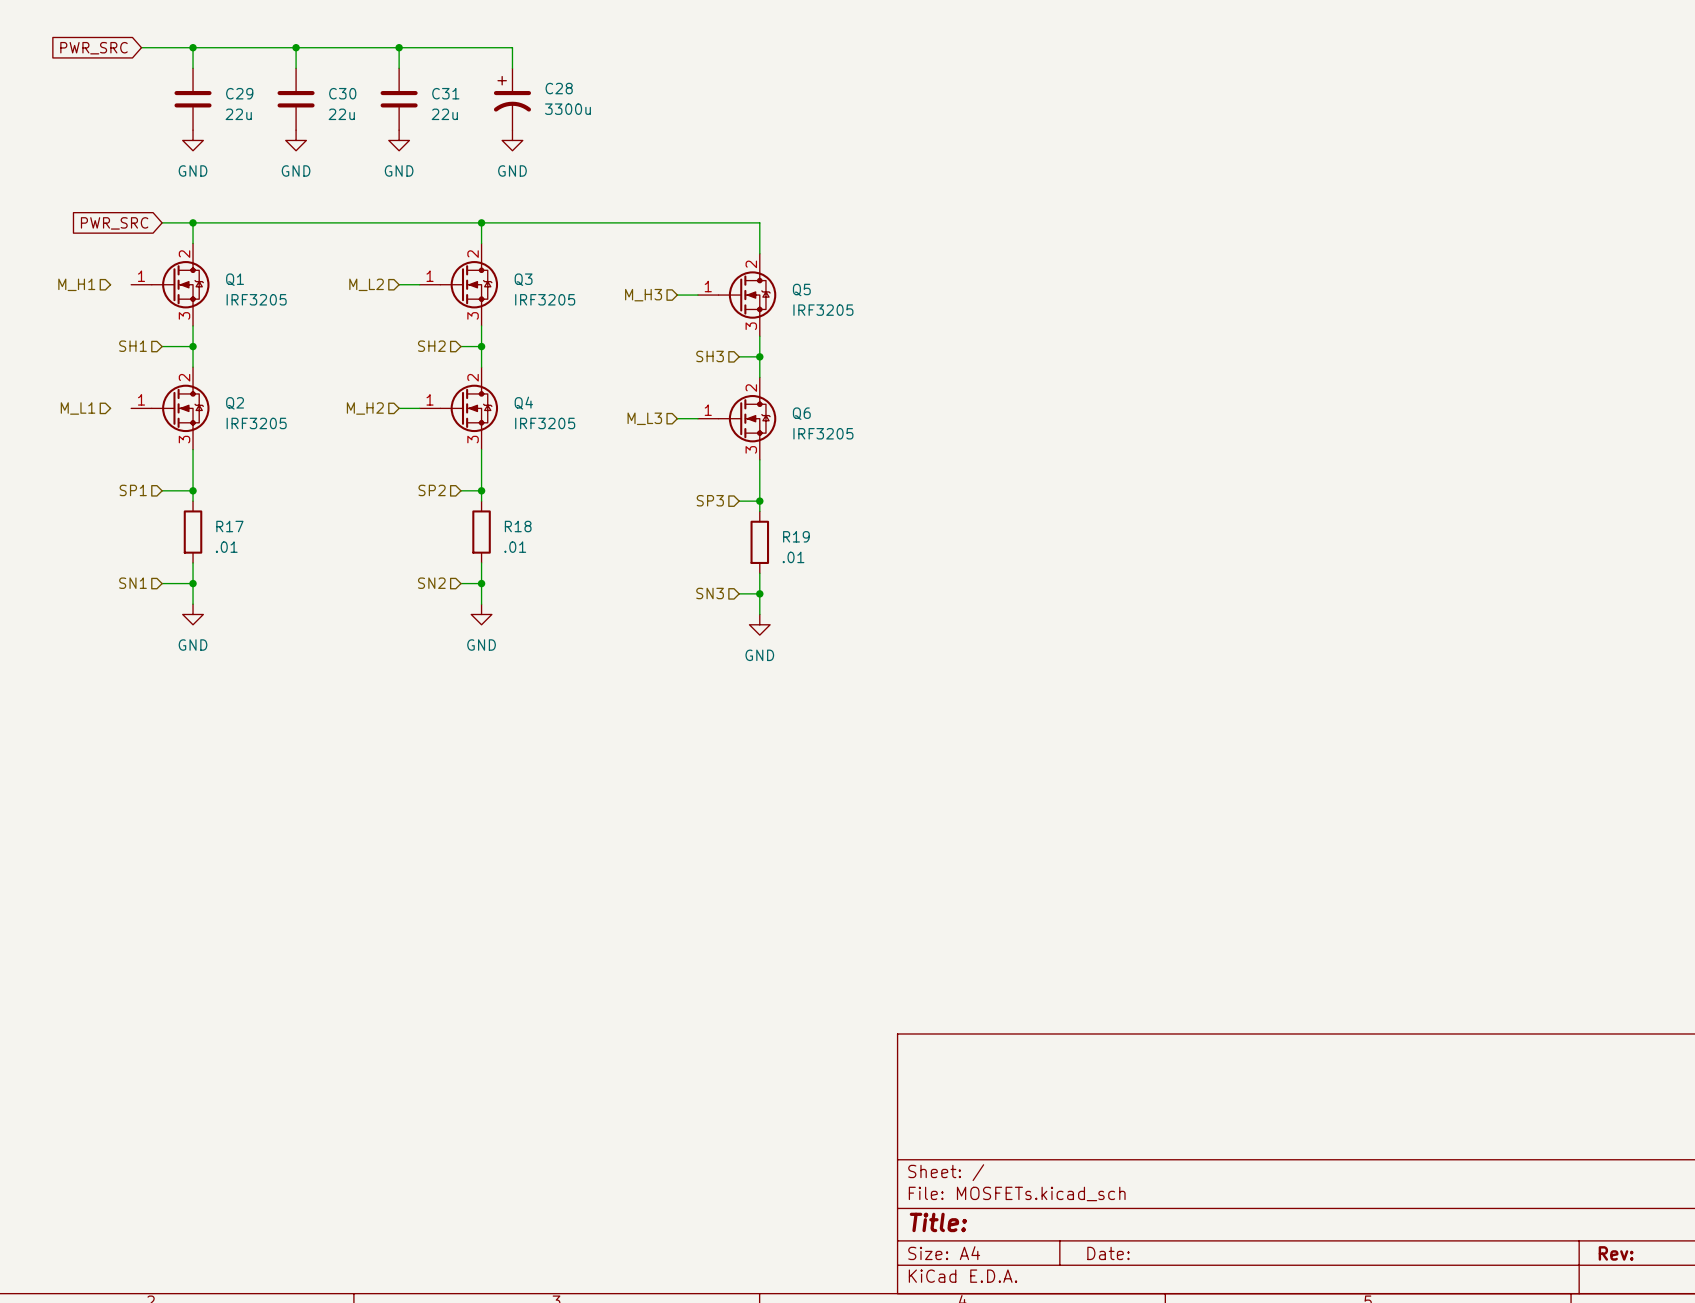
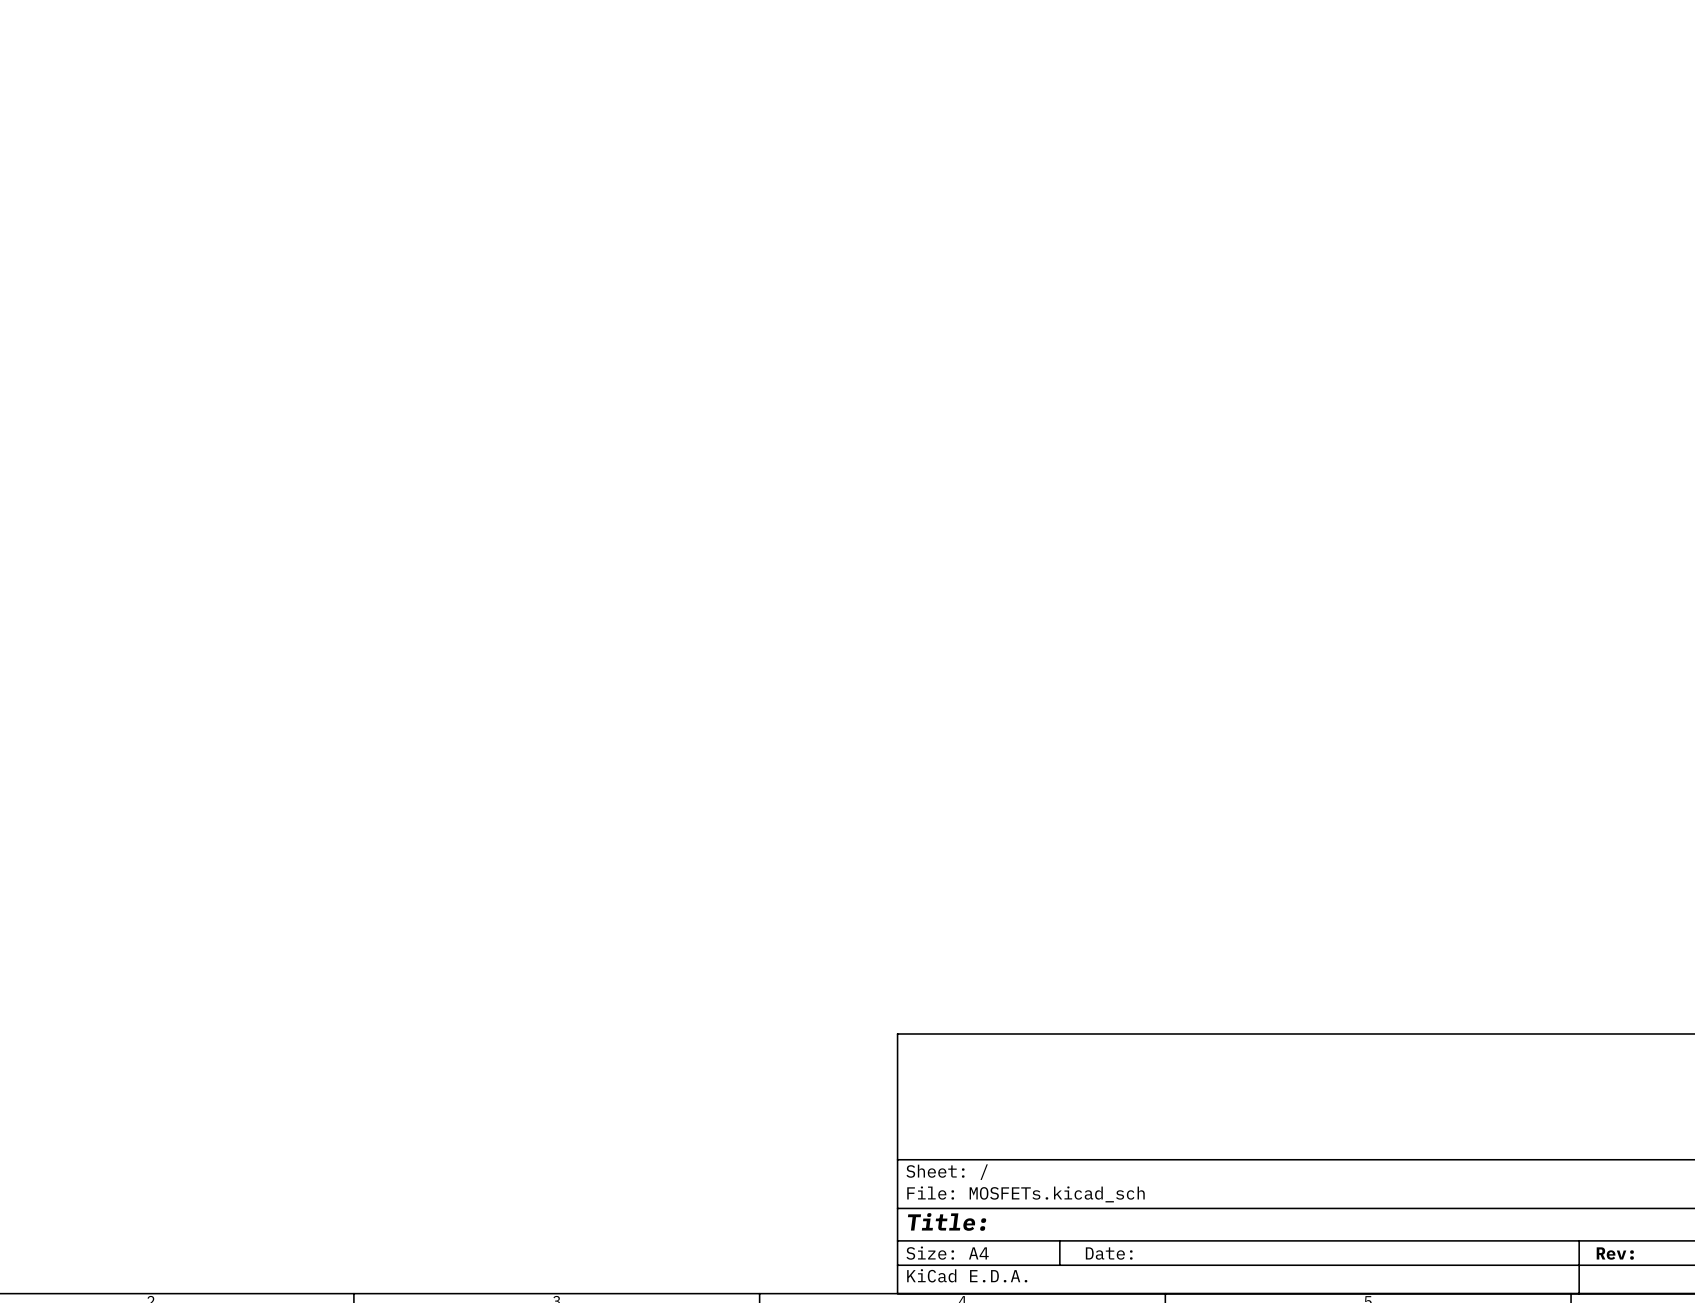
wire: (141, 47) (512, 47) (512, 68) -> none
wire: (193, 47) (193, 68) -> none
junction: (193, 47) -> none
wire: (296, 47) (296, 68) -> none
junction: (296, 47) -> none
wire: (399, 47) (399, 68) -> none
junction: (399, 47) -> none
global label: PWR_SRC (94, 48) -> none
C29: 22u (193, 99) -> none
C30: 22u (296, 99) -> none
C31: 22u (399, 99) -> none
C28: 3300u (512, 99) -> none
power symbol: GND (193, 140) -> none
power symbol: GND (296, 140) -> none
power symbol: GND (399, 140) -> none
power symbol: GND (512, 140) -> none
wire: (162, 222) (759, 222) (759, 253) -> none
wire: (193, 222) (193, 243) -> none
junction: (193, 222) -> none
wire: (481, 222) (481, 243) -> none
junction: (481, 222) -> none
global label: PWR_SRC (114, 223) -> none
hierarchical label: M_H1 (76, 284) -> none
Q1: IRF3205 (170, 284) -> none
hierarchical label: M_L2 (366, 284) -> none
wire: (399, 284) (419, 284) -> none
Q3: IRF3205 (458, 284) -> none
hierarchical label: M_H3 (643, 295) -> none
wire: (677, 295) (697, 295) -> none
Q5: IRF3205 (737, 295) -> none
wire: (193, 325) (193, 367) -> none
wire: (481, 325) (481, 367) -> none
wire: (759, 336) (759, 377) -> none
hierarchical label: SH1 (132, 346) -> none
wire: (162, 346) (193, 346) -> none
junction: (193, 346) -> none
hierarchical label: SH2 (431, 346) -> none
wire: (460, 346) (481, 346) -> none
junction: (481, 346) -> none
hierarchical label: SH3 (710, 356) -> none
wire: (739, 356) (759, 356) -> none
junction: (759, 356) -> none
hierarchical label: M_L1 (78, 408) -> none
Q2: IRF3205 (170, 408) -> none
hierarchical label: M_H2 (365, 408) -> none
wire: (399, 408) (419, 408) -> none
Q4: IRF3205 (458, 408) -> none
hierarchical label: M_L3 (644, 418) -> none
wire: (677, 418) (697, 418) -> none
Q6: IRF3205 (737, 418) -> none
wire: (193, 449) (193, 501) -> none
wire: (481, 449) (481, 501) -> none
wire: (759, 459) (759, 511) -> none
hierarchical label: SP1 (133, 490) -> none
wire: (162, 490) (193, 490) -> none
junction: (193, 490) -> none
hierarchical label: SP2 (432, 490) -> none
wire: (460, 490) (481, 490) -> none
junction: (481, 490) -> none
hierarchical label: SP3 (710, 500) -> none
wire: (739, 501) (759, 501) -> none
junction: (759, 501) -> none
R17: .01 (193, 532) -> none
R18: .01 (481, 532) -> none
R19: .01 (759, 542) -> none
wire: (193, 562) (193, 604) -> none
wire: (481, 562) (481, 604) -> none
wire: (759, 573) (759, 614) -> none
hierarchical label: SN1 (132, 583) -> none
wire: (162, 583) (193, 583) -> none
junction: (193, 583) -> none
hierarchical label: SN2 (431, 583) -> none
wire: (460, 583) (481, 583) -> none
junction: (481, 583) -> none
hierarchical label: SN3 (710, 593) -> none
wire: (739, 593) (759, 593) -> none
junction: (759, 593) -> none
power symbol: GND (193, 614) -> none
power symbol: GND (481, 614) -> none
power symbol: GND (759, 624) -> none

